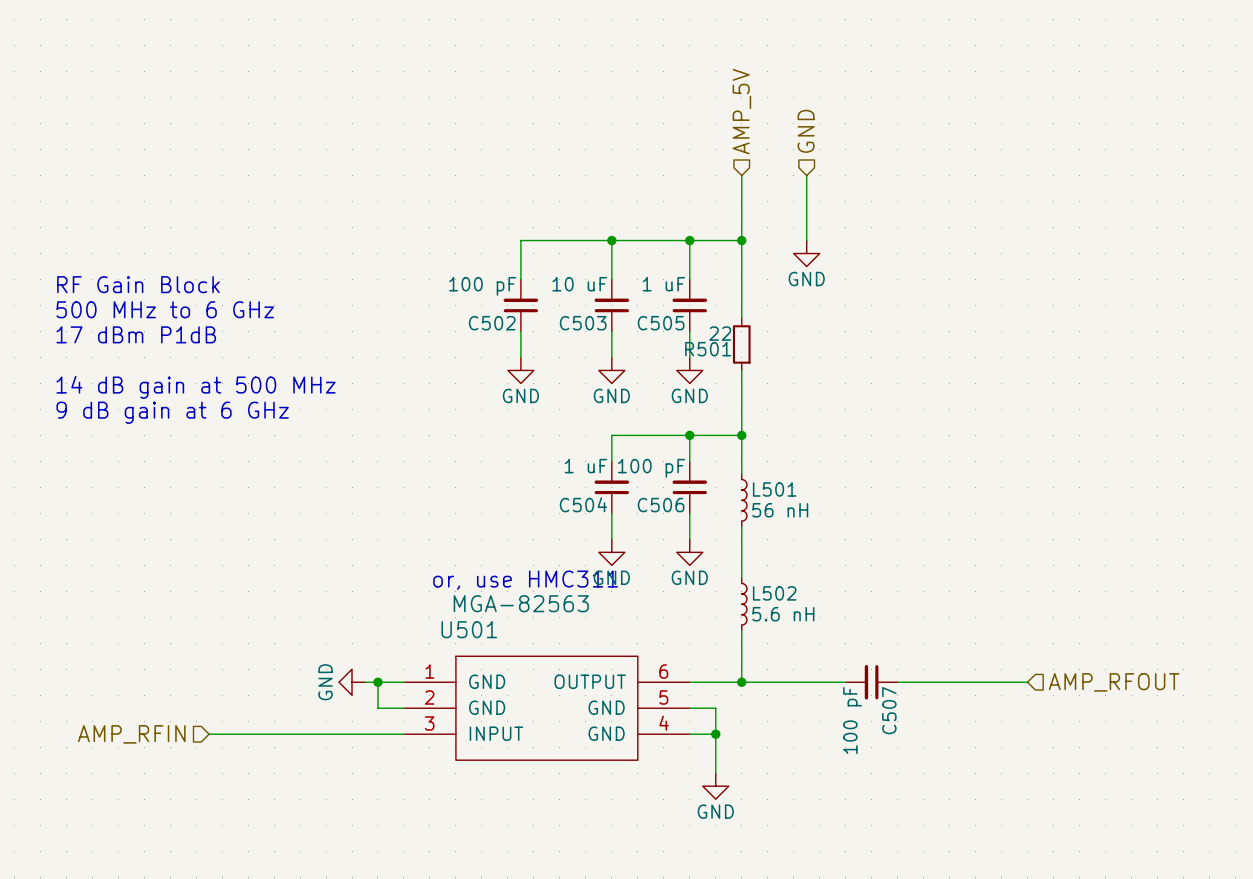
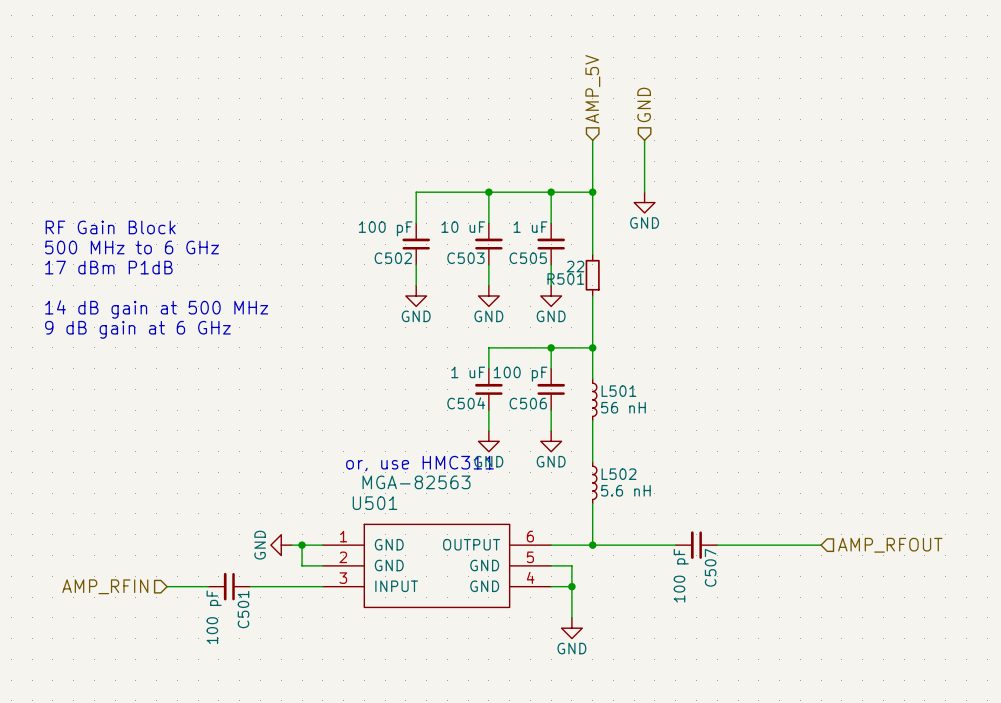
C501: none -> 100 pF (229, 586)

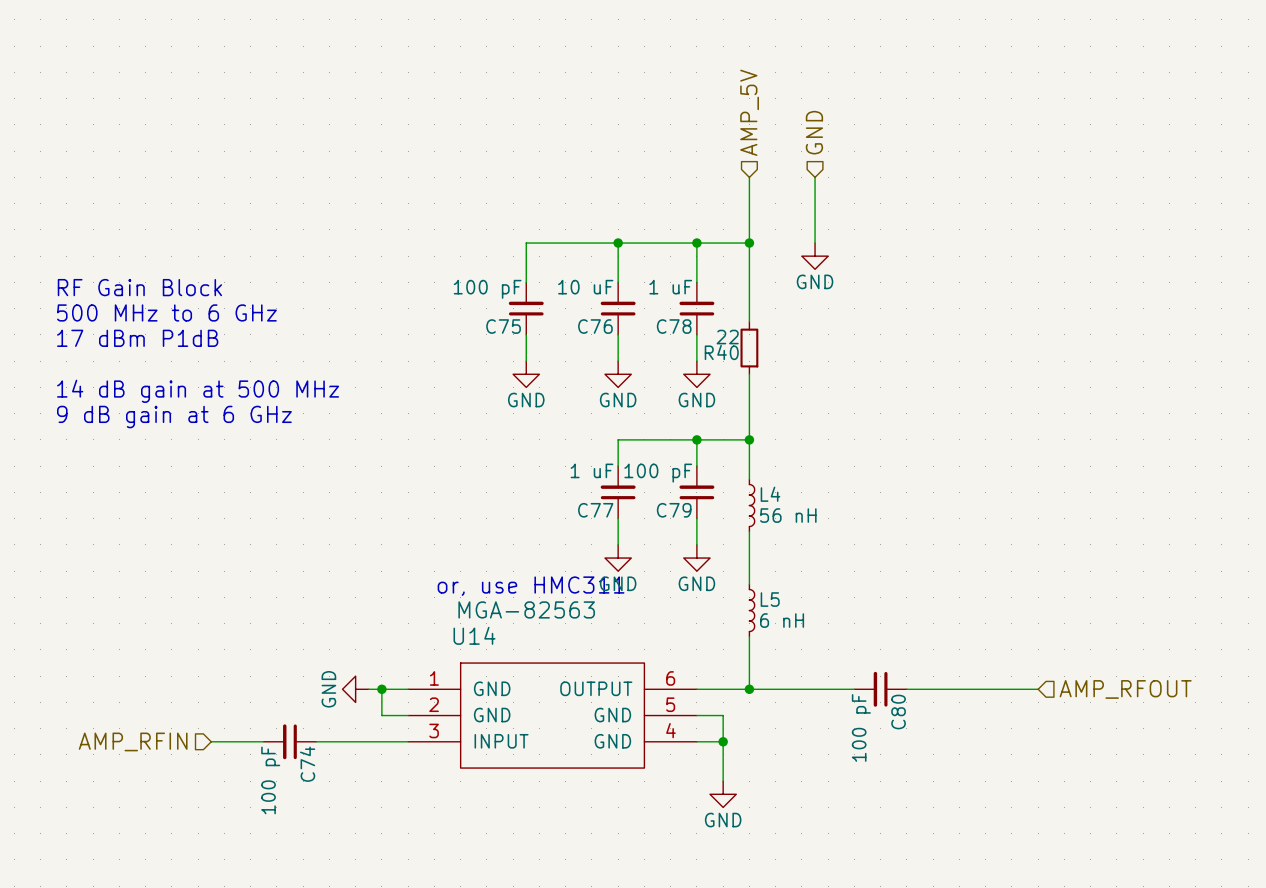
C502 name: C502 (393, 258) -> C75 (503, 326)
C503 name: C503 (465, 258) -> C76 (595, 326)
C505 name: C505 (528, 258) -> C78 (674, 326)
R501 name: R501 (565, 279) -> R40 (721, 352)
L501 name: L501 (619, 391) -> L4 (770, 494)
C504 name: C504 (466, 403) -> C77 (595, 510)
C506 name: C506 (528, 403) -> C79 (674, 510)
L502 name: L502 (619, 474) -> L5 (770, 599)
L502 value: 5.6 nH (625, 490) -> 6 nH (782, 620)
U501 name: U501 (374, 503) -> U14 (474, 635)
C507 name: C507 (710, 567) -> C80 (898, 712)
C501 name: C501 (243, 609) -> C74 (307, 764)

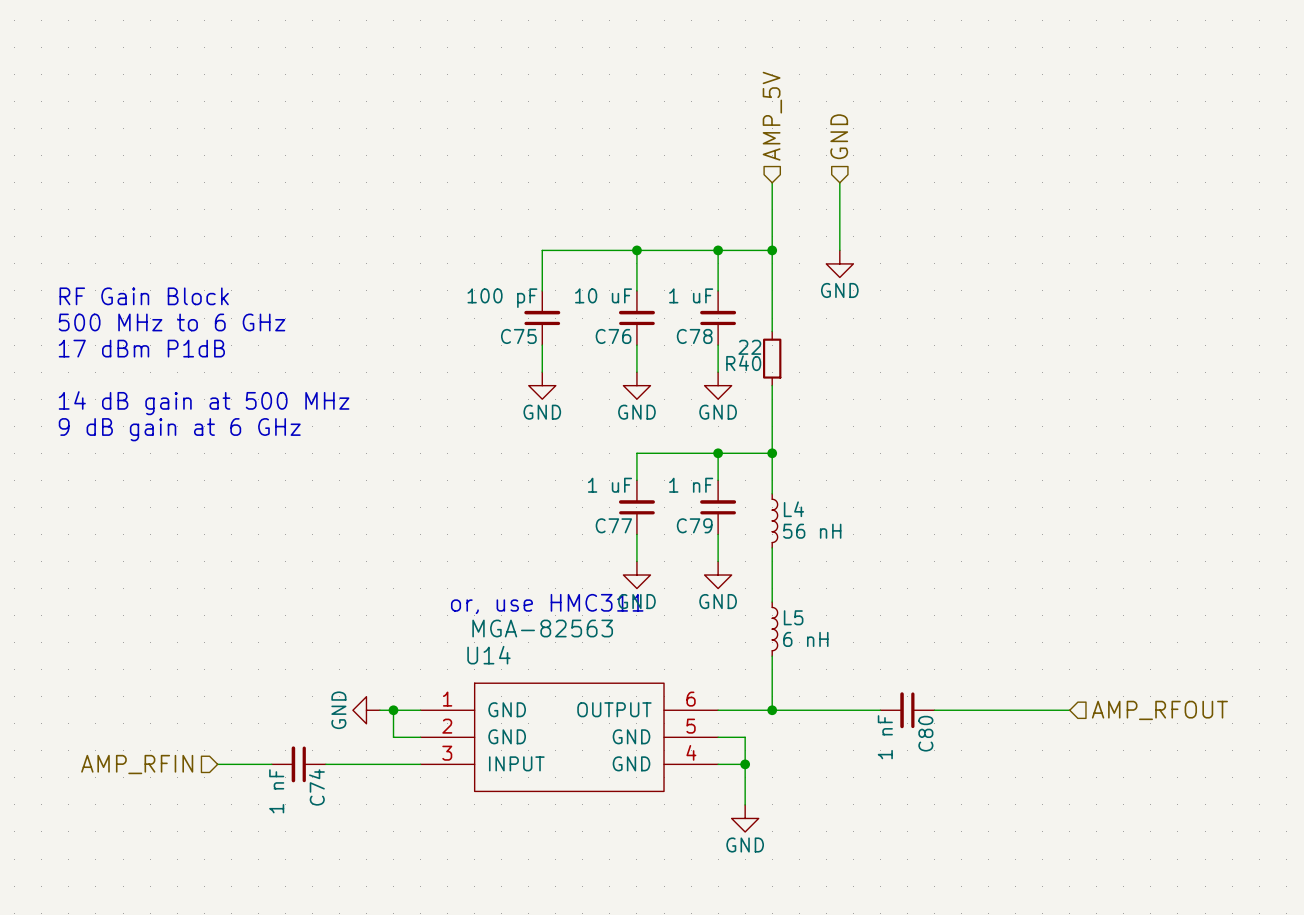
C79 value: 100 pF (658, 473) -> 1 nF (691, 485)
C80 value: 100 pF (861, 727) -> 1 nF (885, 737)
C74 value: 100 pF (270, 780) -> 1 nF (276, 791)

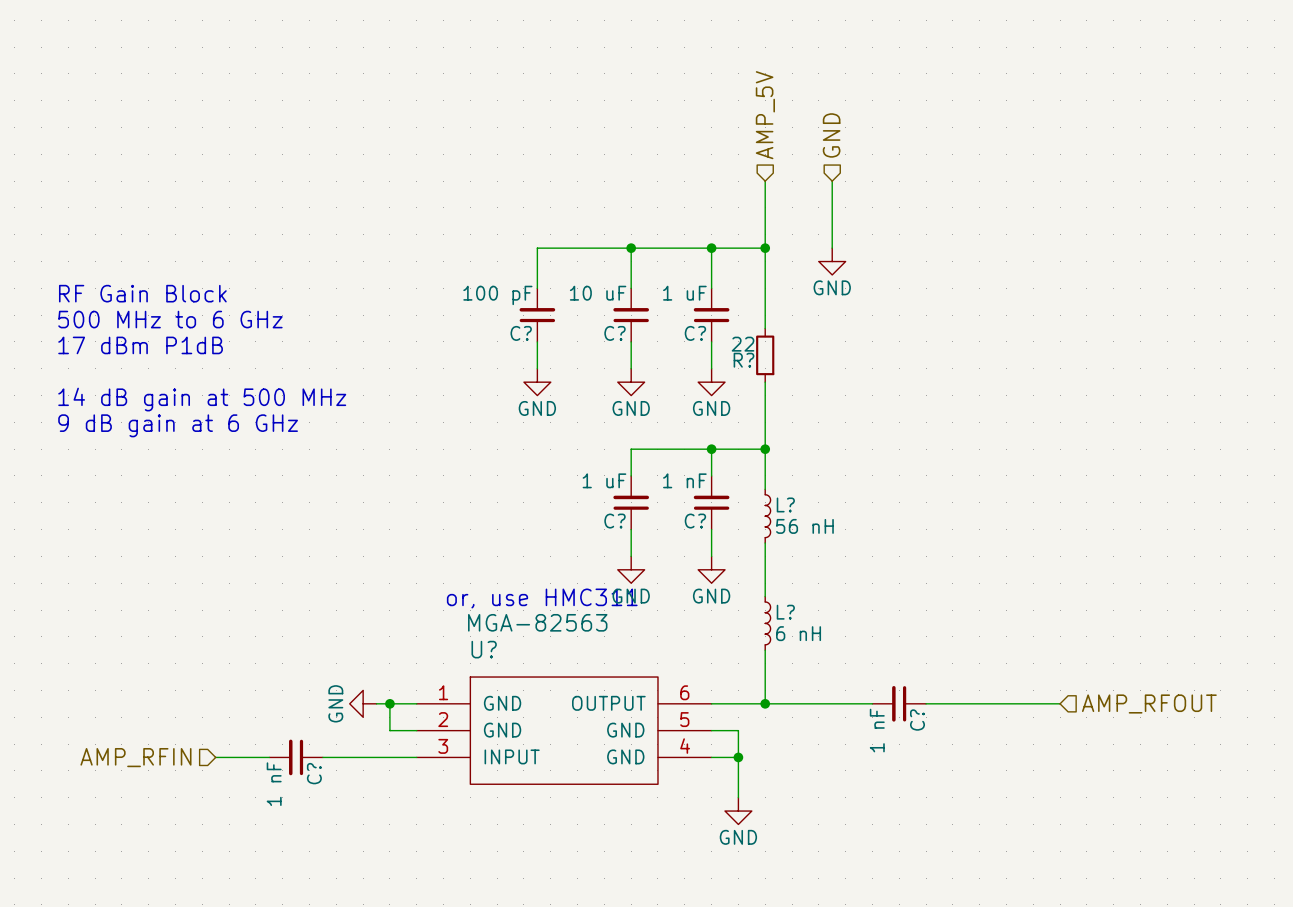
C75 name: C75 (518, 336) -> C? (521, 333)
C76 name: C76 (613, 336) -> C? (615, 333)
C78 name: C78 (694, 336) -> C? (695, 333)
R40 name: R40 (743, 363) -> R? (743, 360)
L4 name: L4 (793, 509) -> L? (785, 504)
C77 name: C77 (613, 525) -> C? (615, 521)
C79 name: C79 (694, 525) -> C? (695, 521)
L5 name: L5 (793, 617) -> L? (785, 612)
U14 name: U14 (488, 655) -> U? (484, 649)
C80 name: C80 (925, 733) -> C? (917, 720)
C74 name: C74 (316, 787) -> C? (314, 773)

